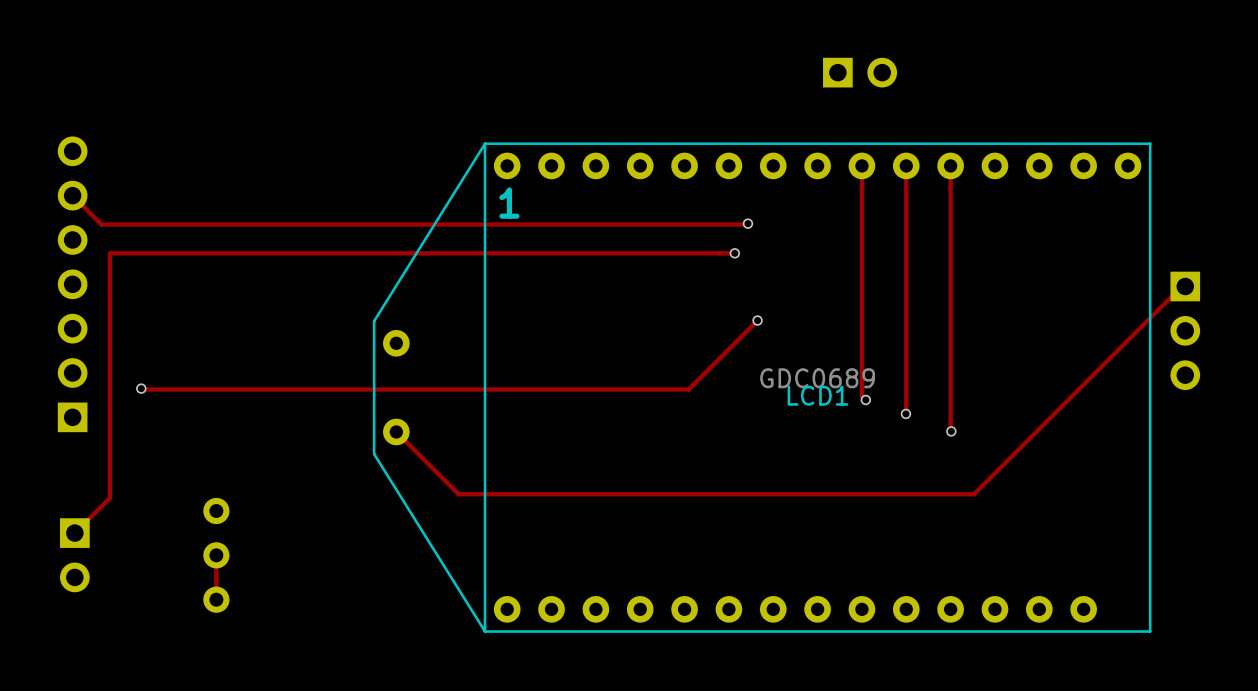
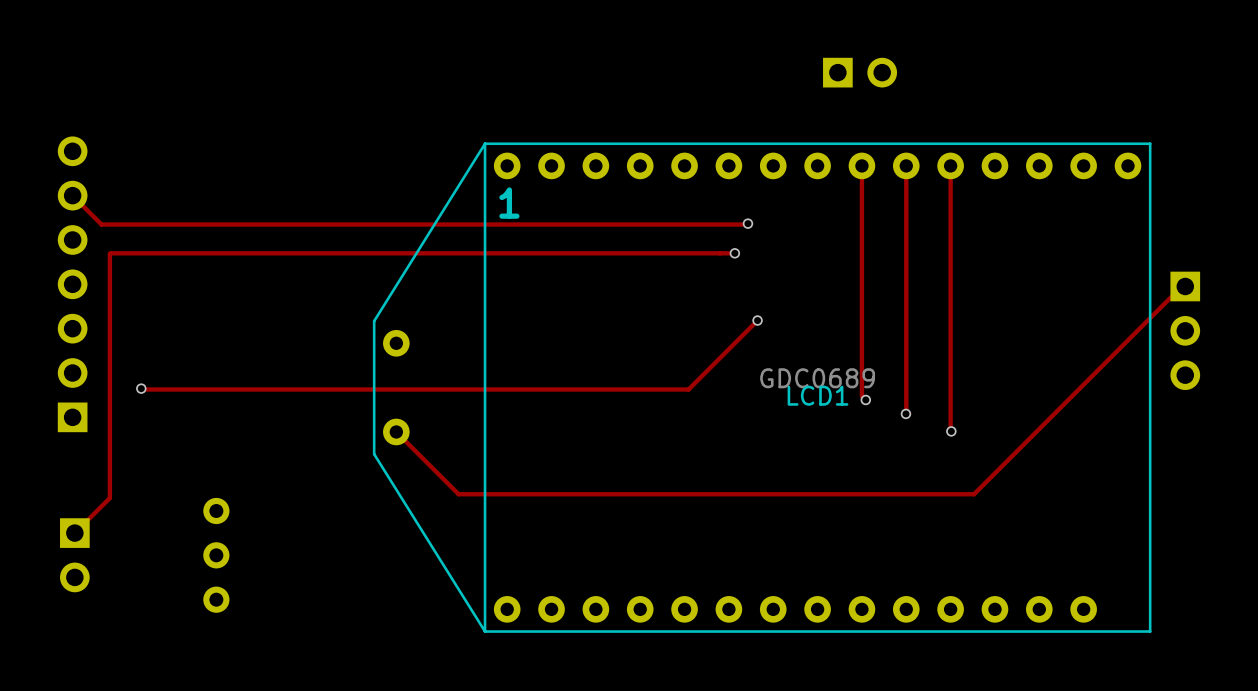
track: (216, 555) (216, 599) -> none

